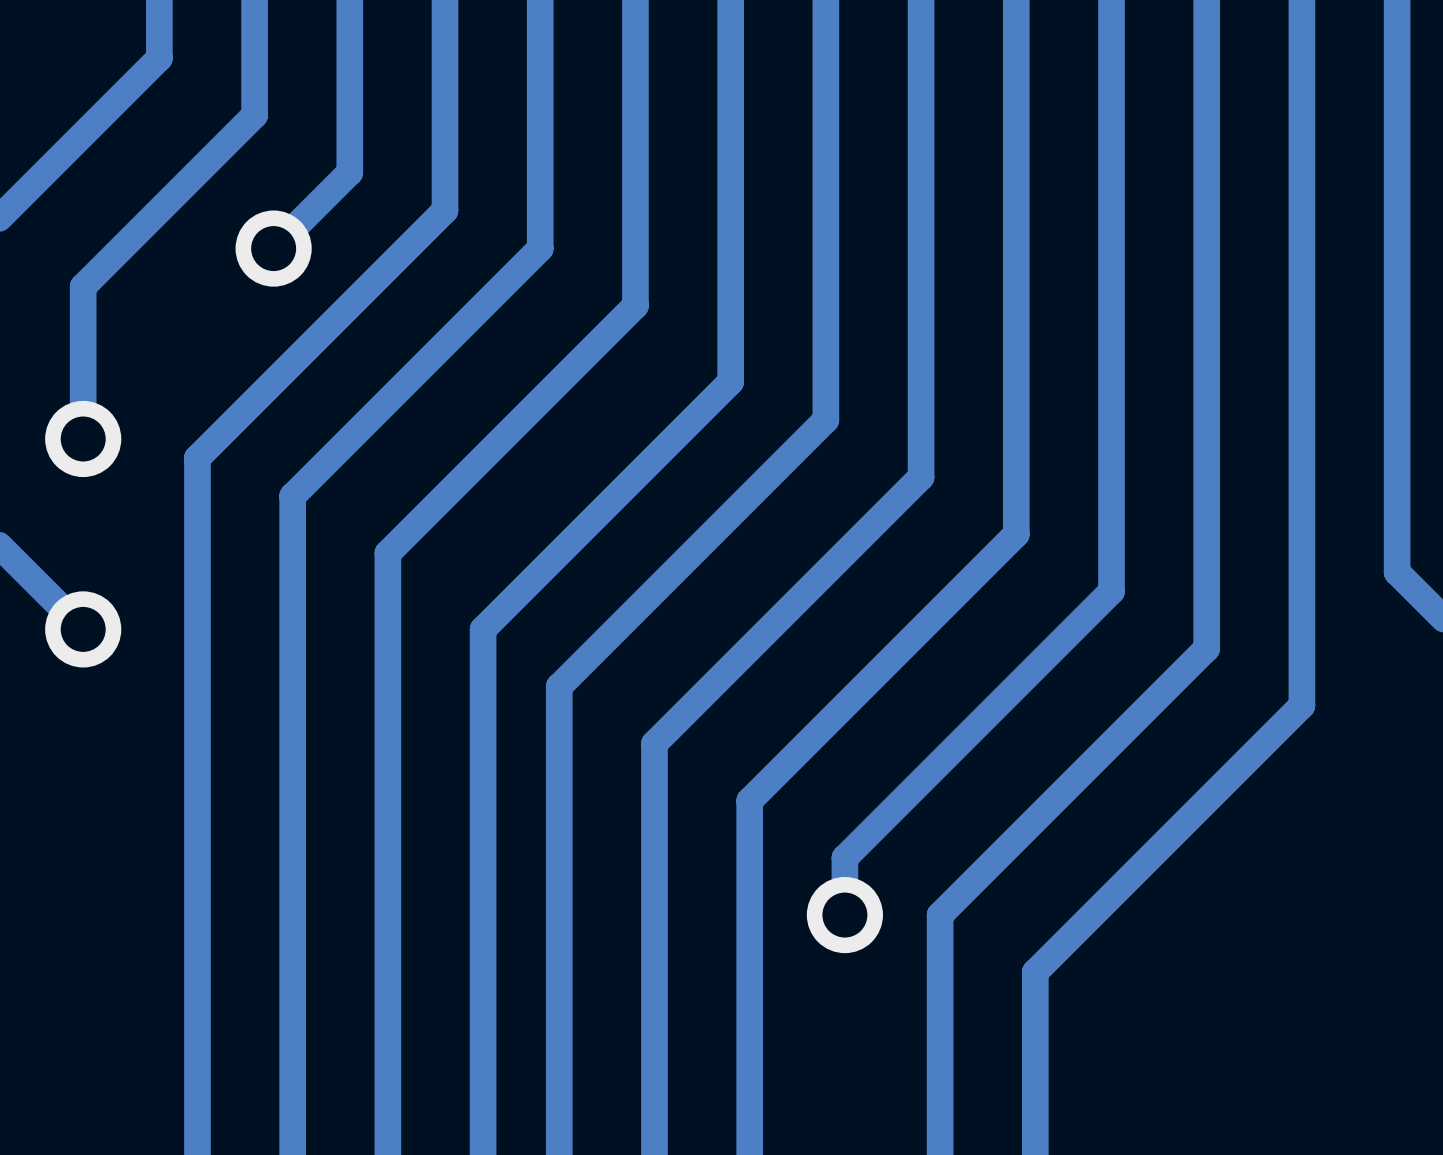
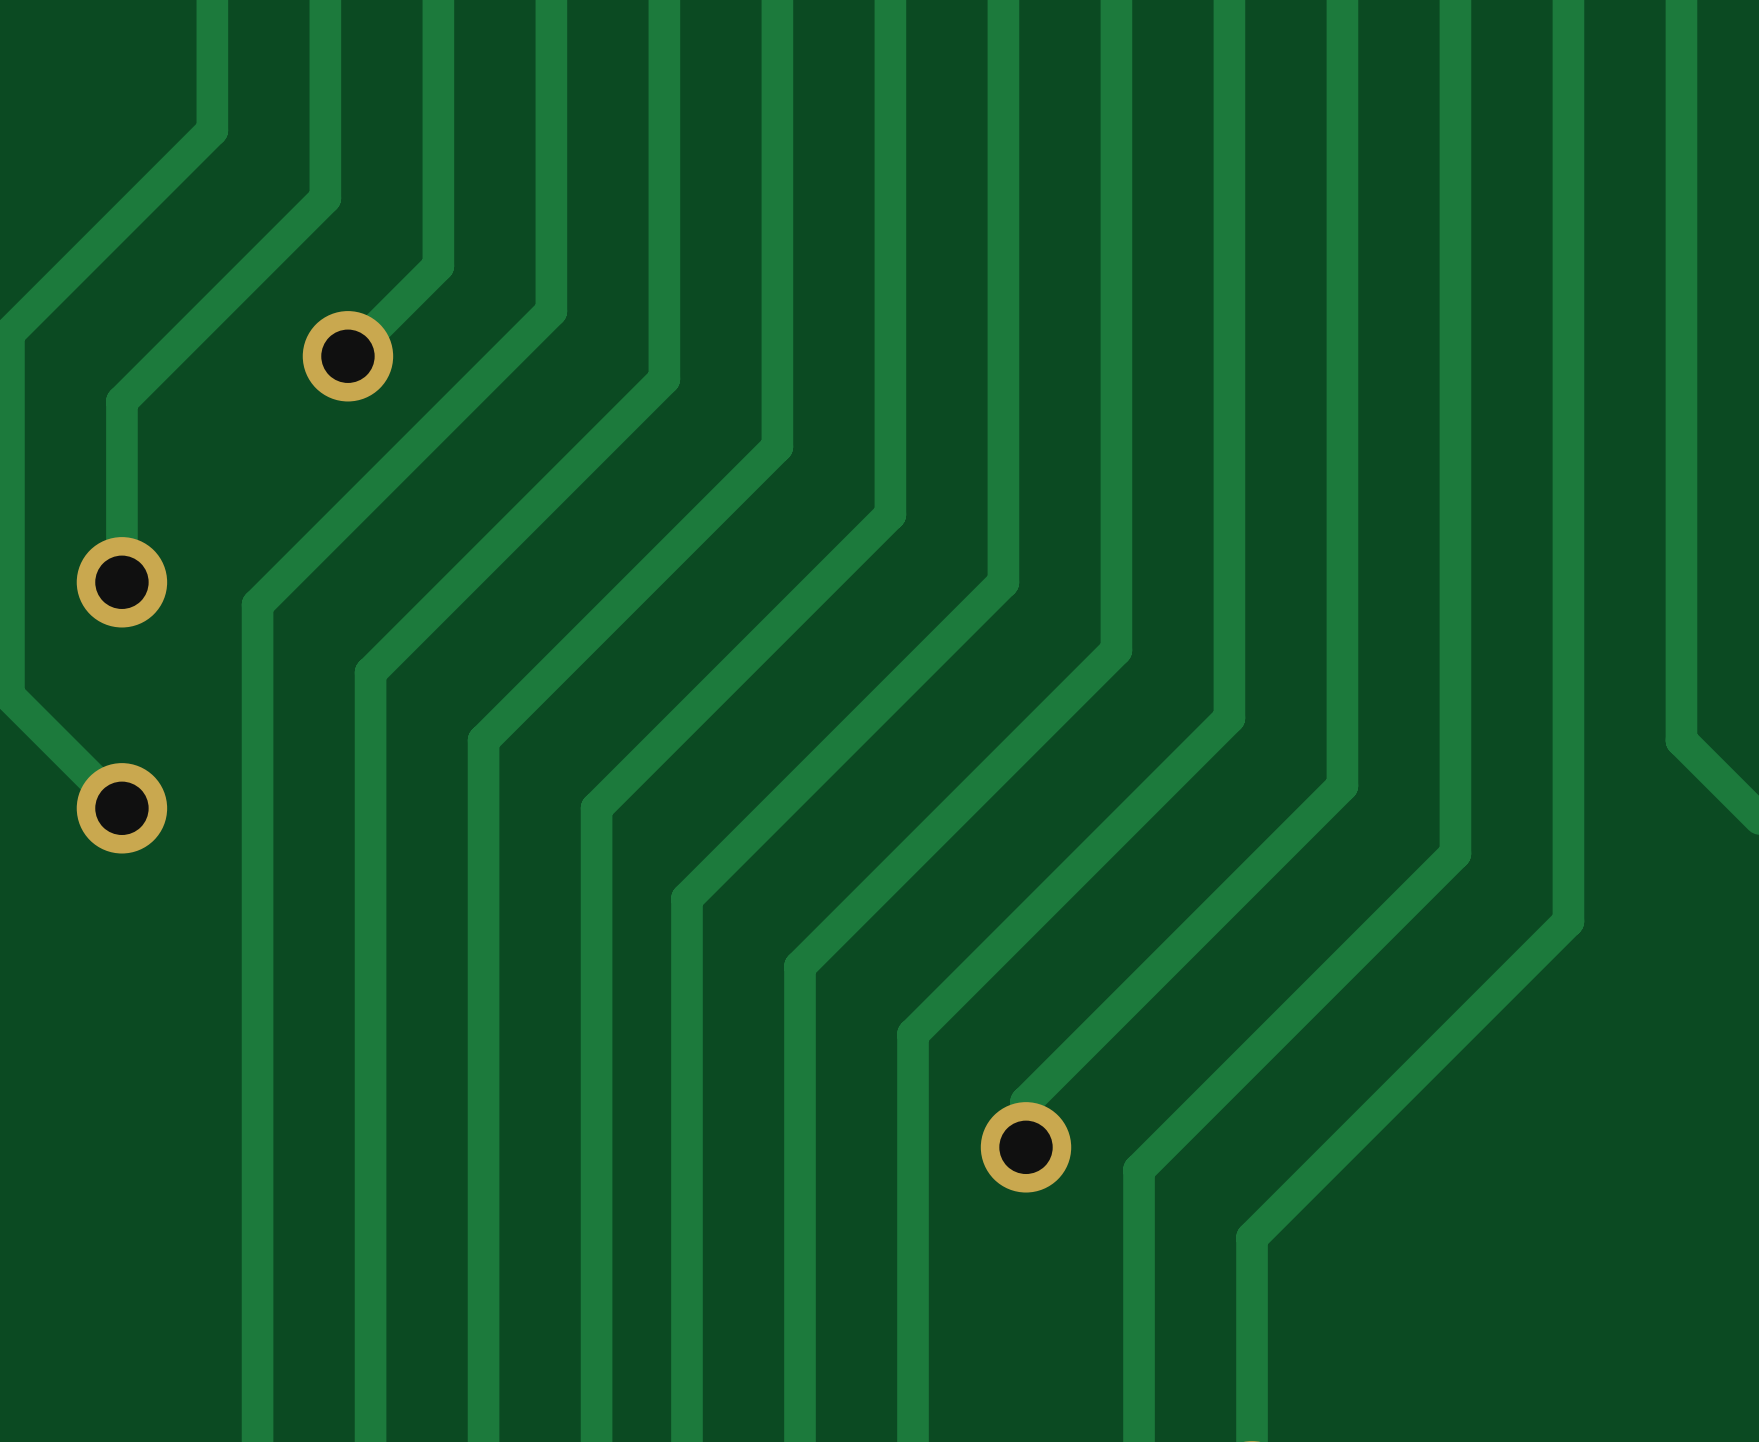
track: (540, 248) (292, 496) (292, 515) -> (664, 356) (664, 378) (370, 672)
track: (635, 305) (387, 553) (387, 572) -> (777, 424) (777, 446) (483, 740)
track: (825, 419) (559, 686) (559, 705) -> (1003, 559) (1003, 582) (686, 898)
track: (921, 477) (654, 743) (654, 762) -> (1116, 627) (1116, 650) (799, 966)
track: (1016, 534) (749, 800) (749, 819) -> (1229, 695) (1229, 717) (913, 1034)
track: (1111, 591) (844, 857) (844, 876) -> (1342, 763) (1342, 785) (1026, 1102)
track: (1206, 648) (940, 915) (940, 934) -> (1455, 830) (1455, 853) (1139, 1169)
track: (1301, 705) (1035, 972) (1035, 991) -> (1568, 898) (1568, 921) (1252, 1237)

